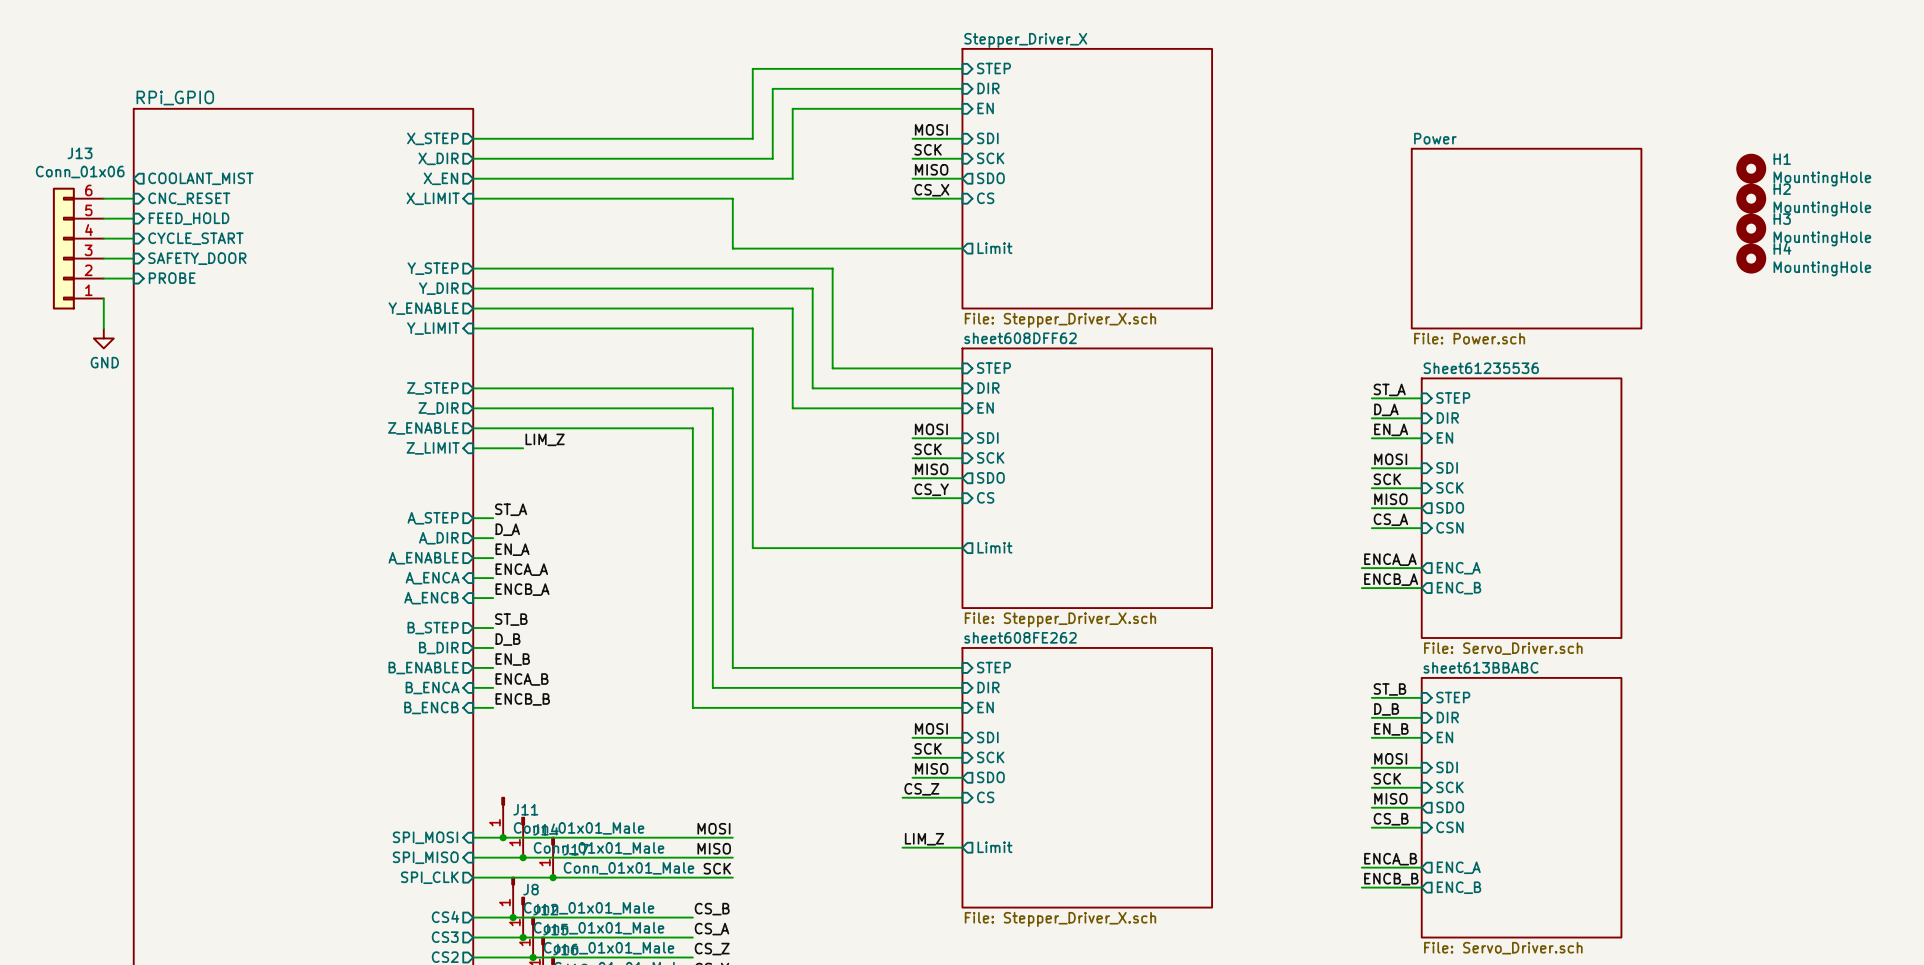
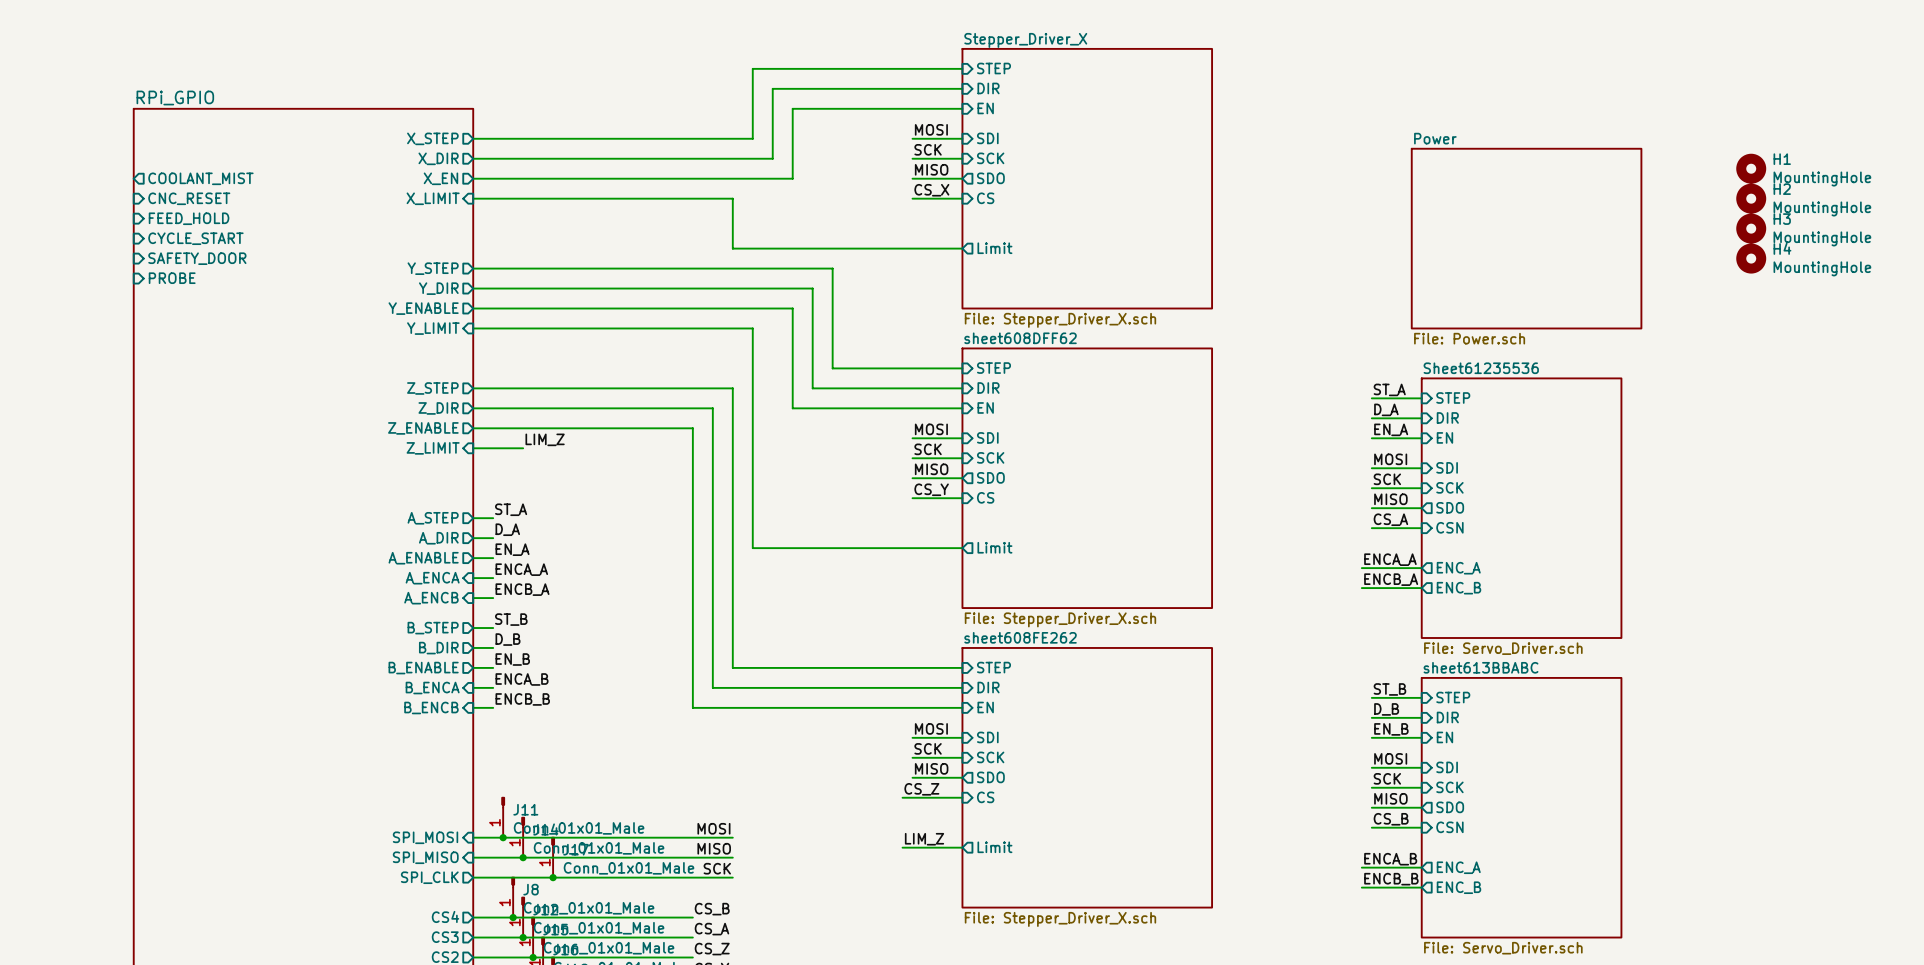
wire: (103, 198) (133, 198) -> none
wire: (103, 218) (133, 218) -> none
wire: (103, 238) (133, 238) -> none
J13: Conn_01x06 (78, 248) -> none
wire: (103, 258) (133, 258) -> none
wire: (103, 278) (133, 278) -> none
wire: (103, 298) (103, 328) -> none
power symbol: GND (103, 338) -> none

